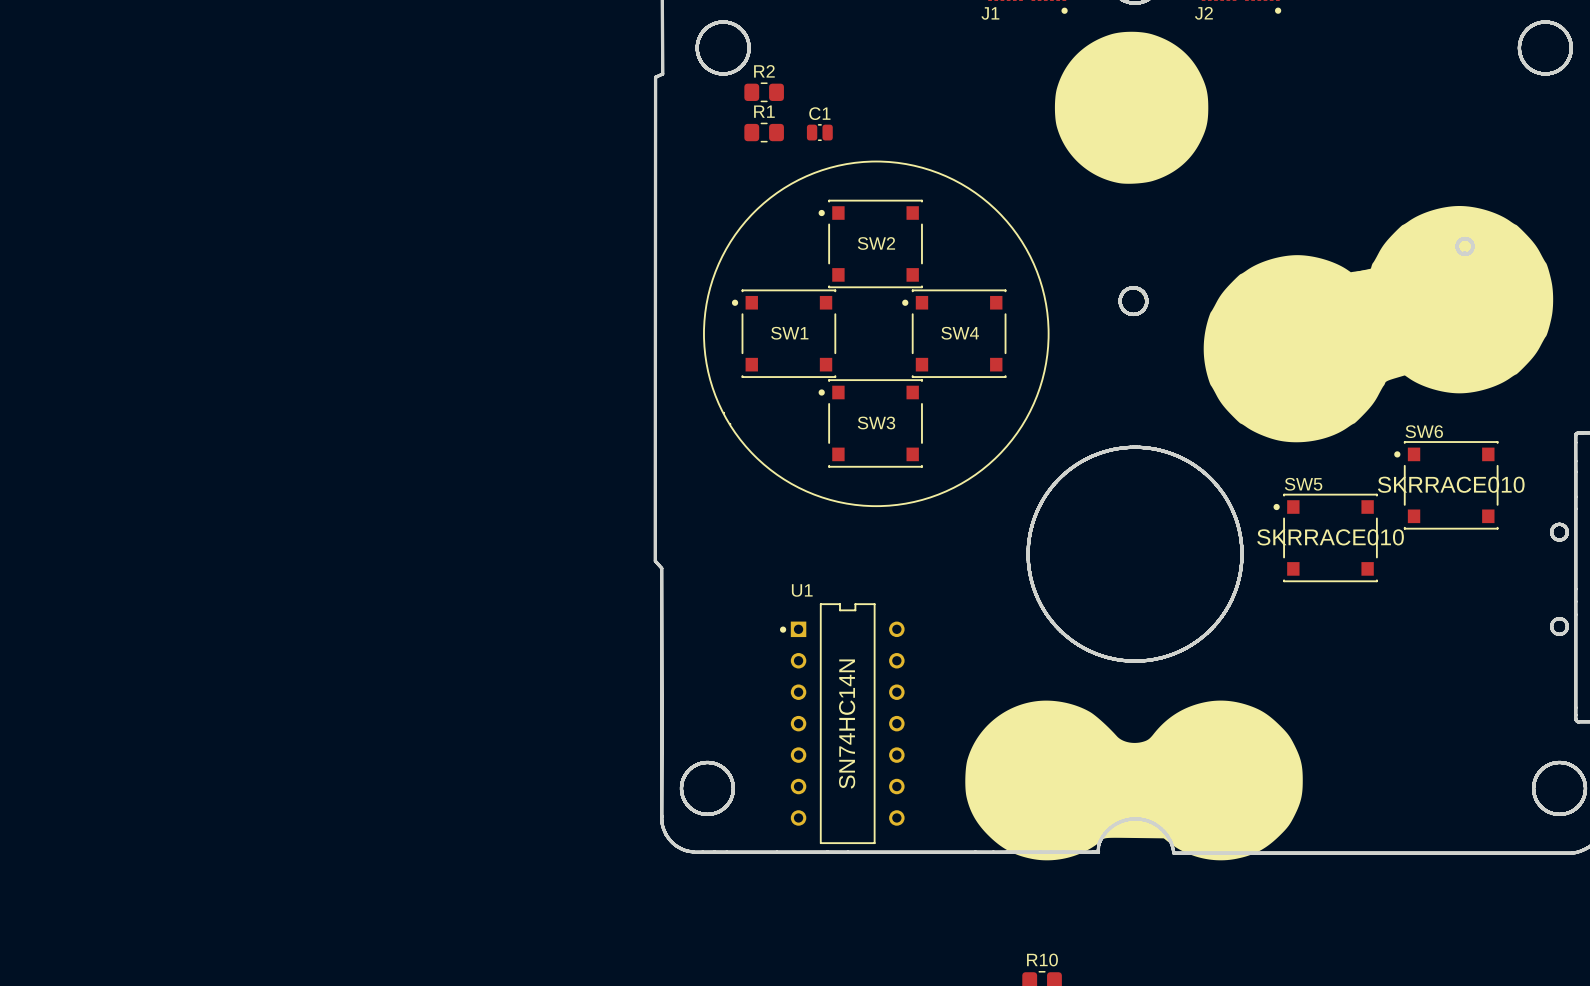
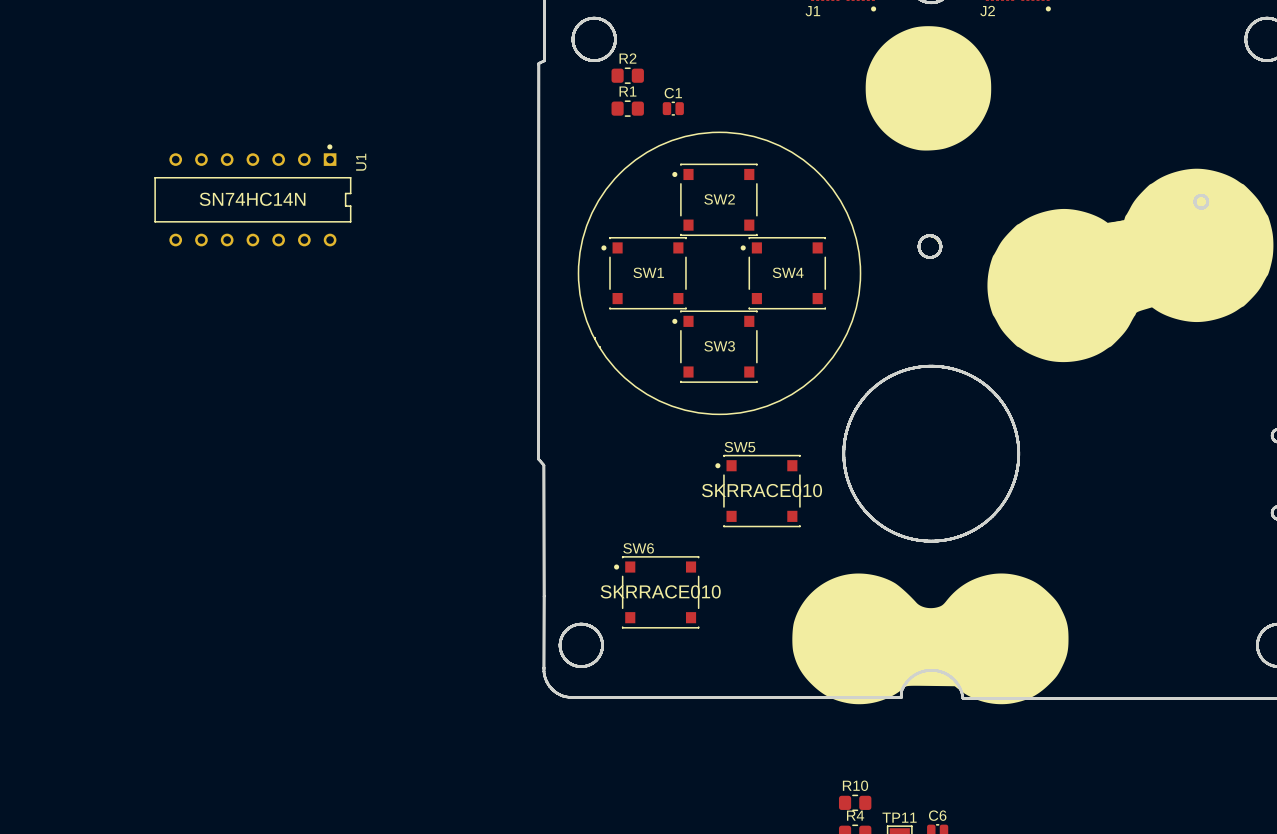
SW6 position: (1446, 485) -> (656, 592)
SW5 position: (1325, 537) -> (758, 491)
U1 rotation: 0° (842, 723) -> 90° clockwise (252, 195)
U1 position: (842, 723) -> (252, 195)

